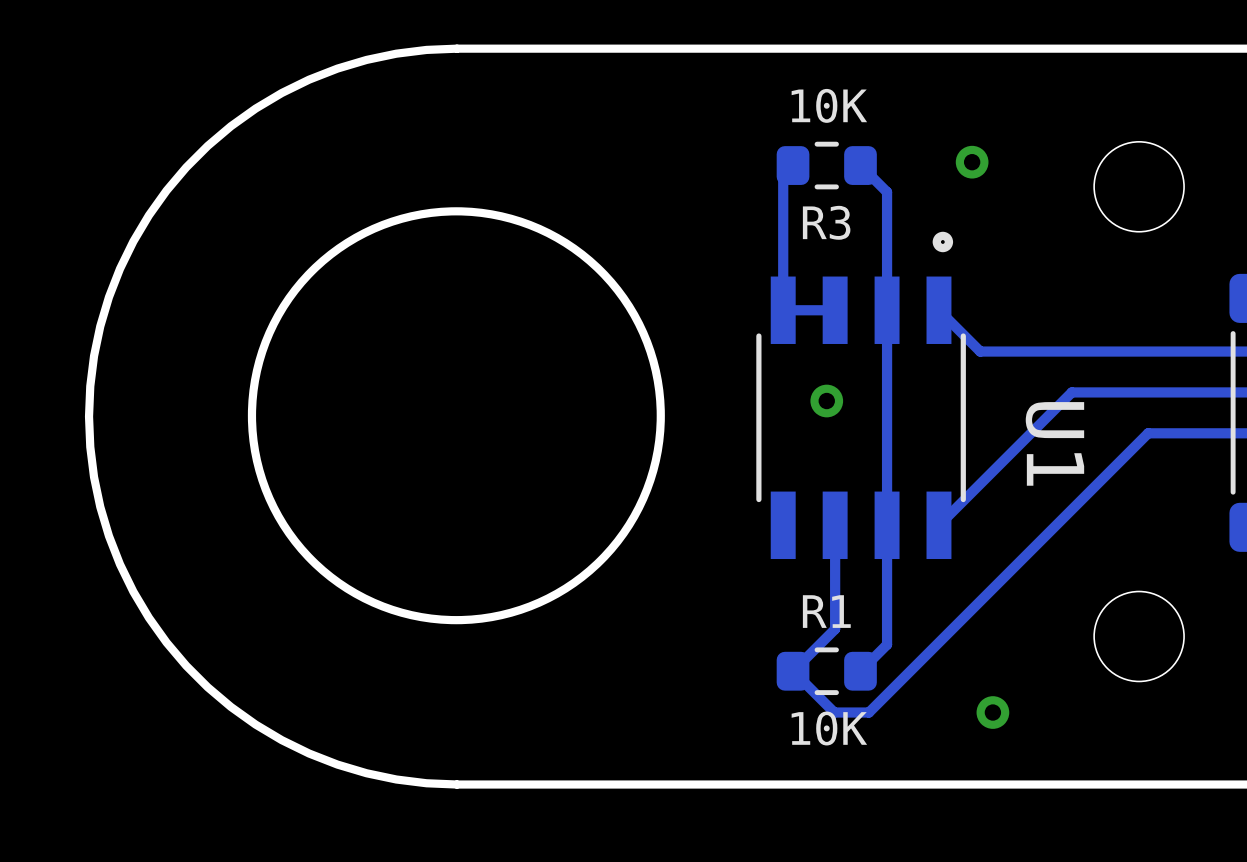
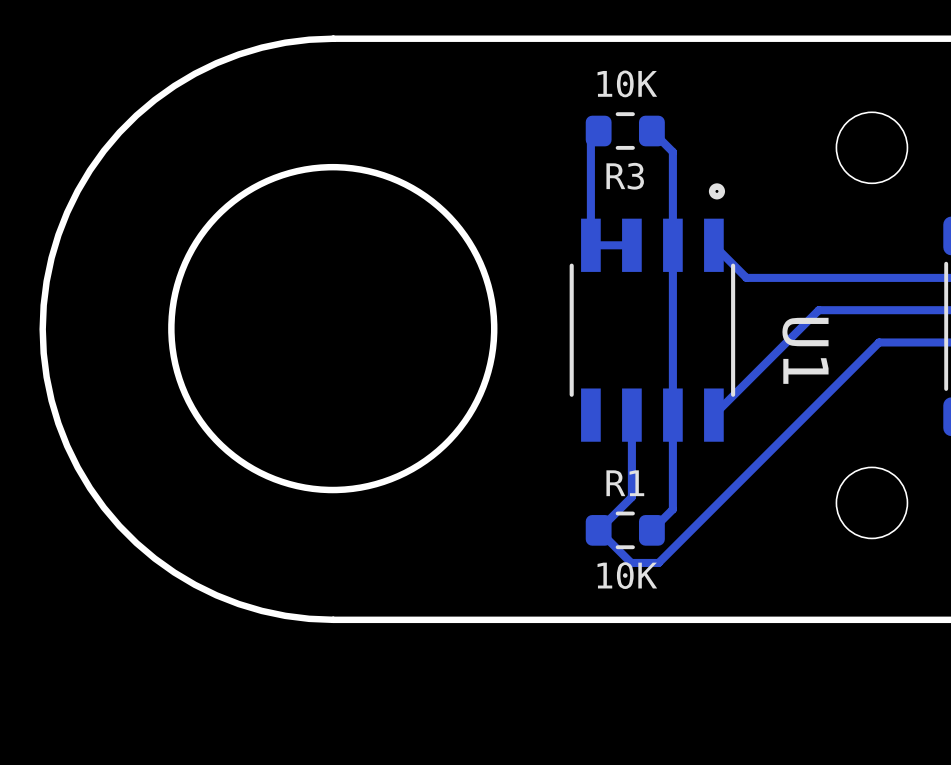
via: (972, 162) -> none
via: (826, 401) -> none
via: (992, 712) -> none

